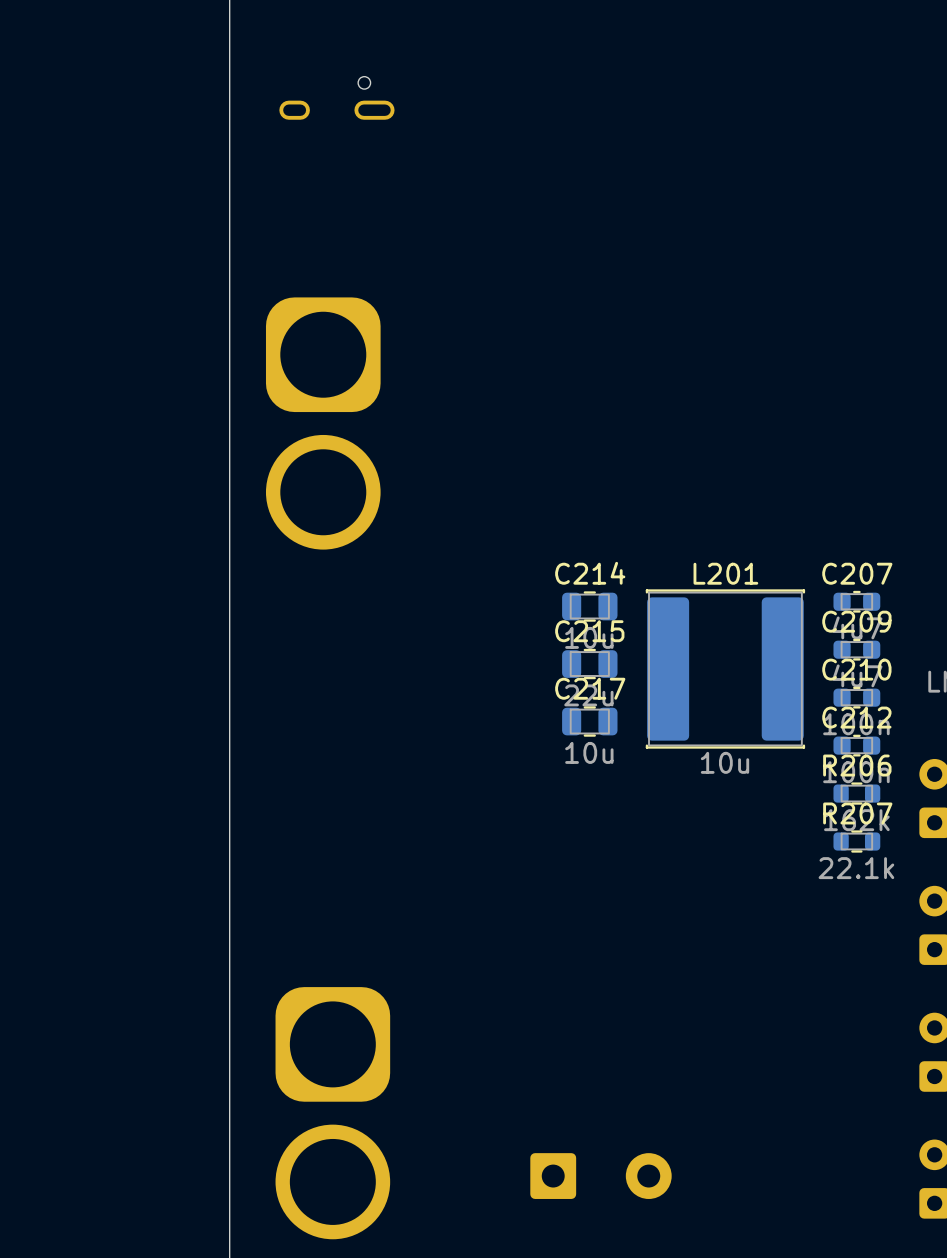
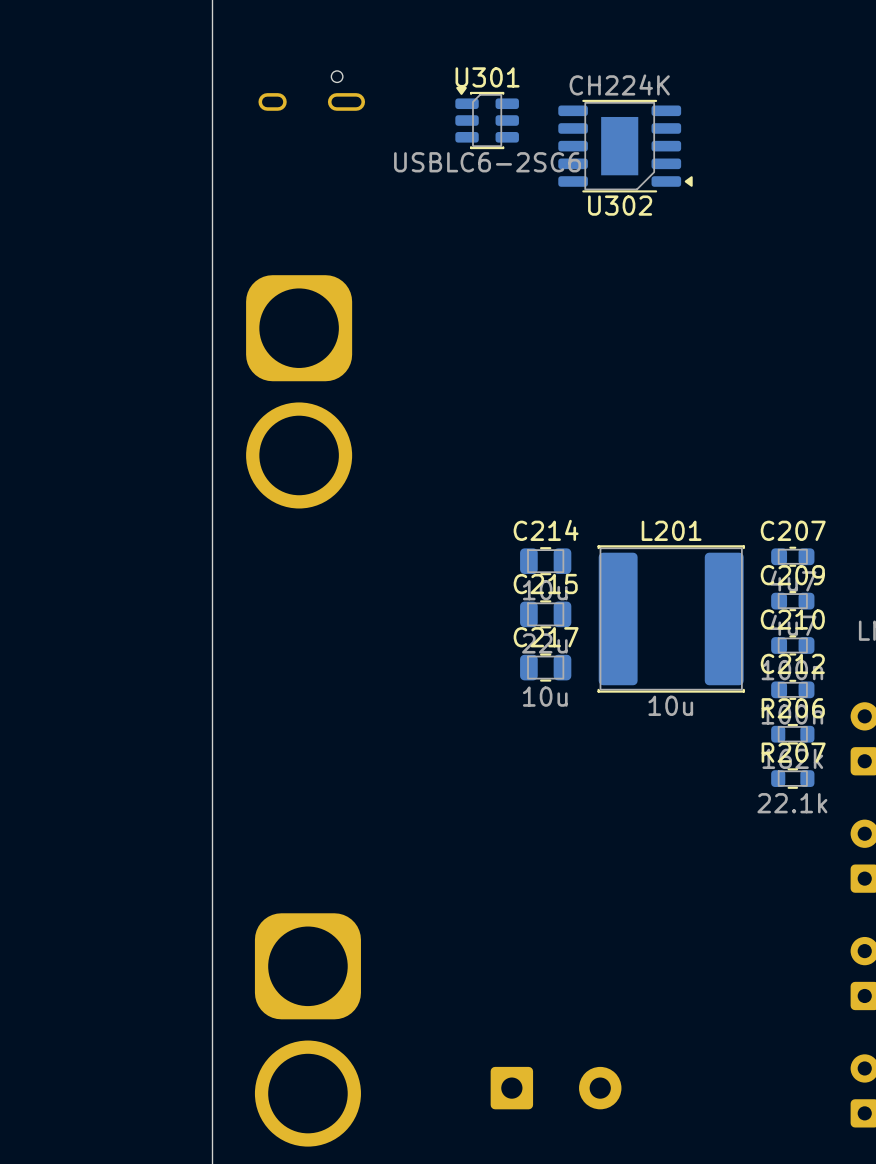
U301: none -> USBLC6-2SC6 (487, 118)
U302: none -> CH224K (625, 146)

